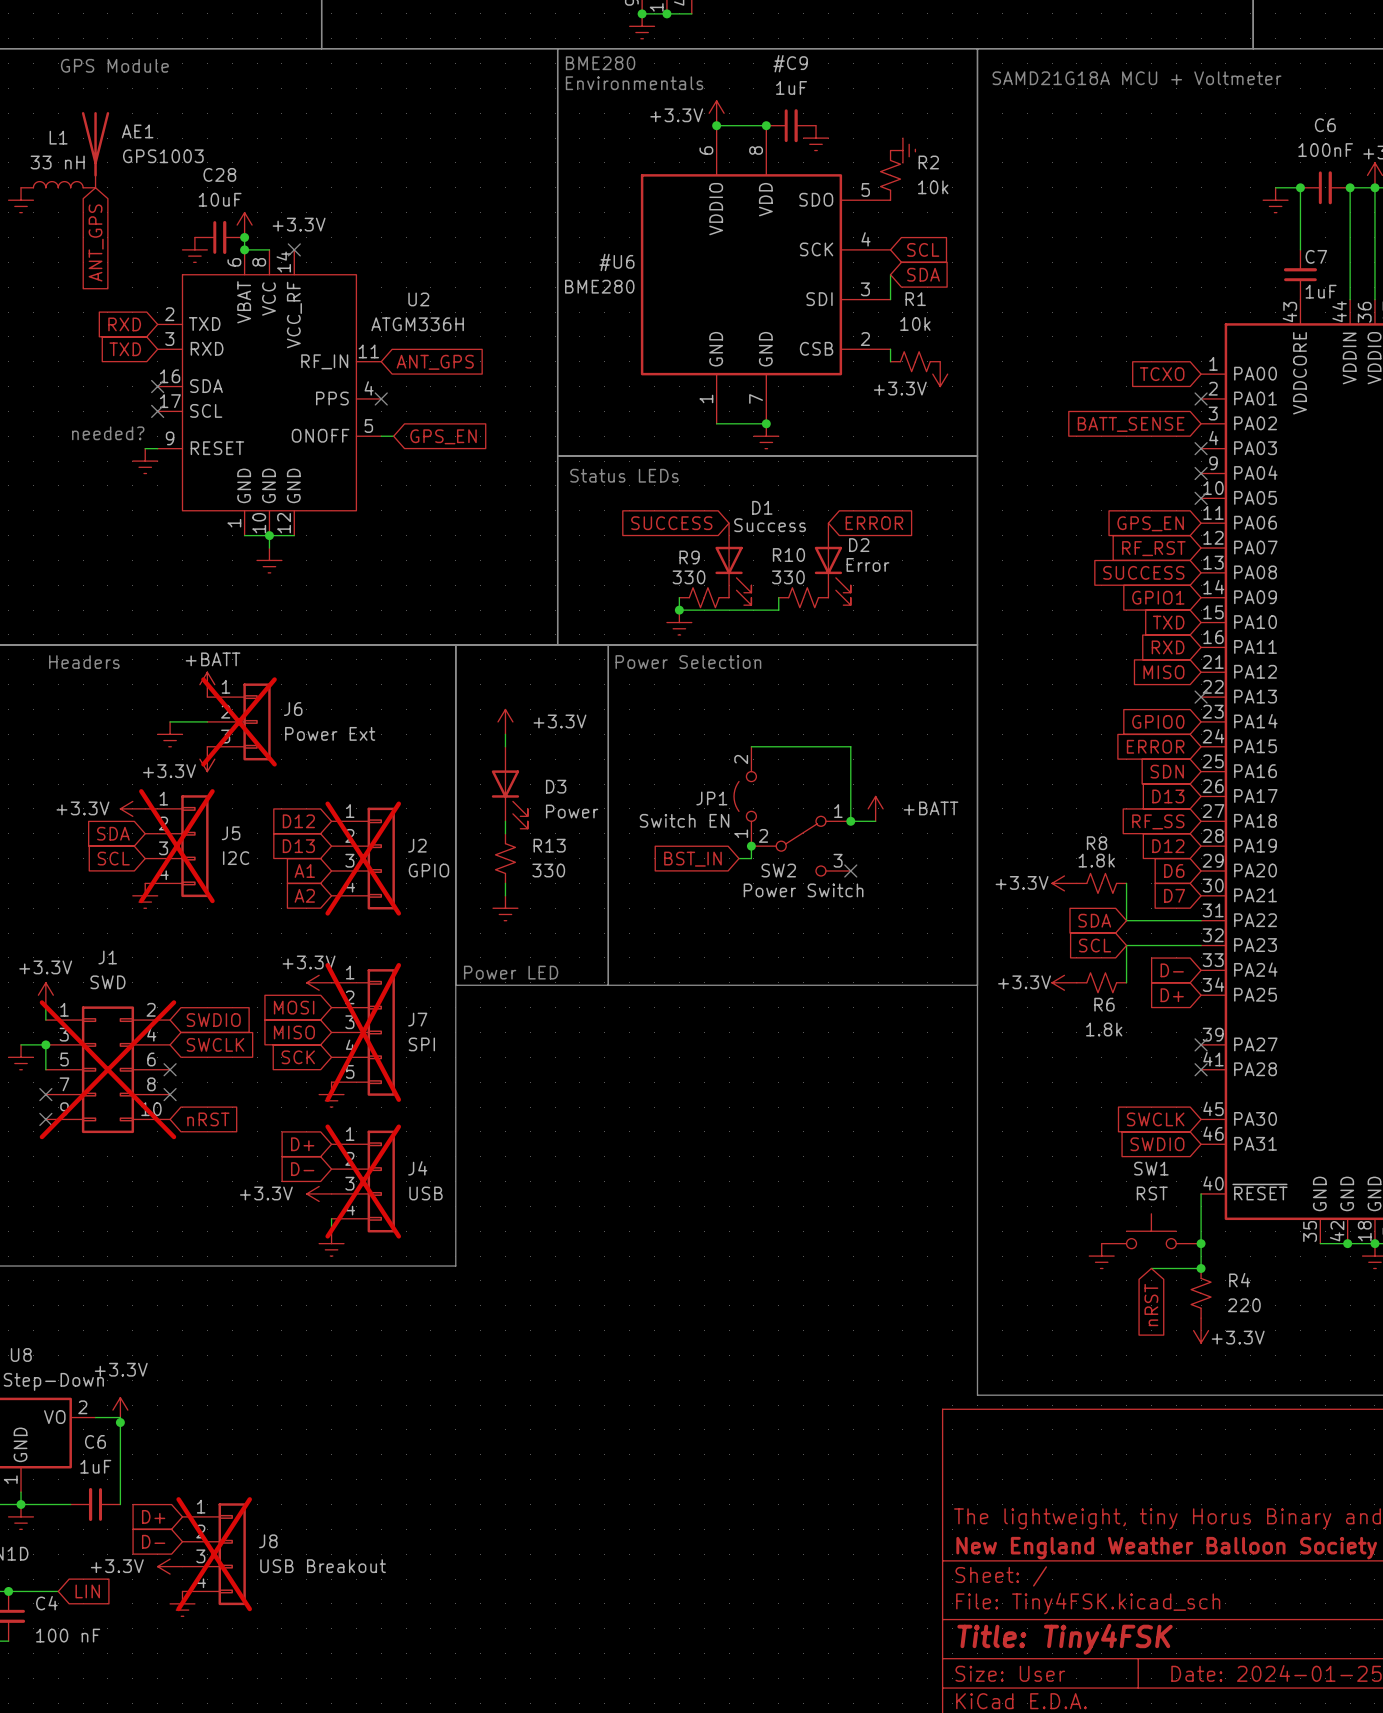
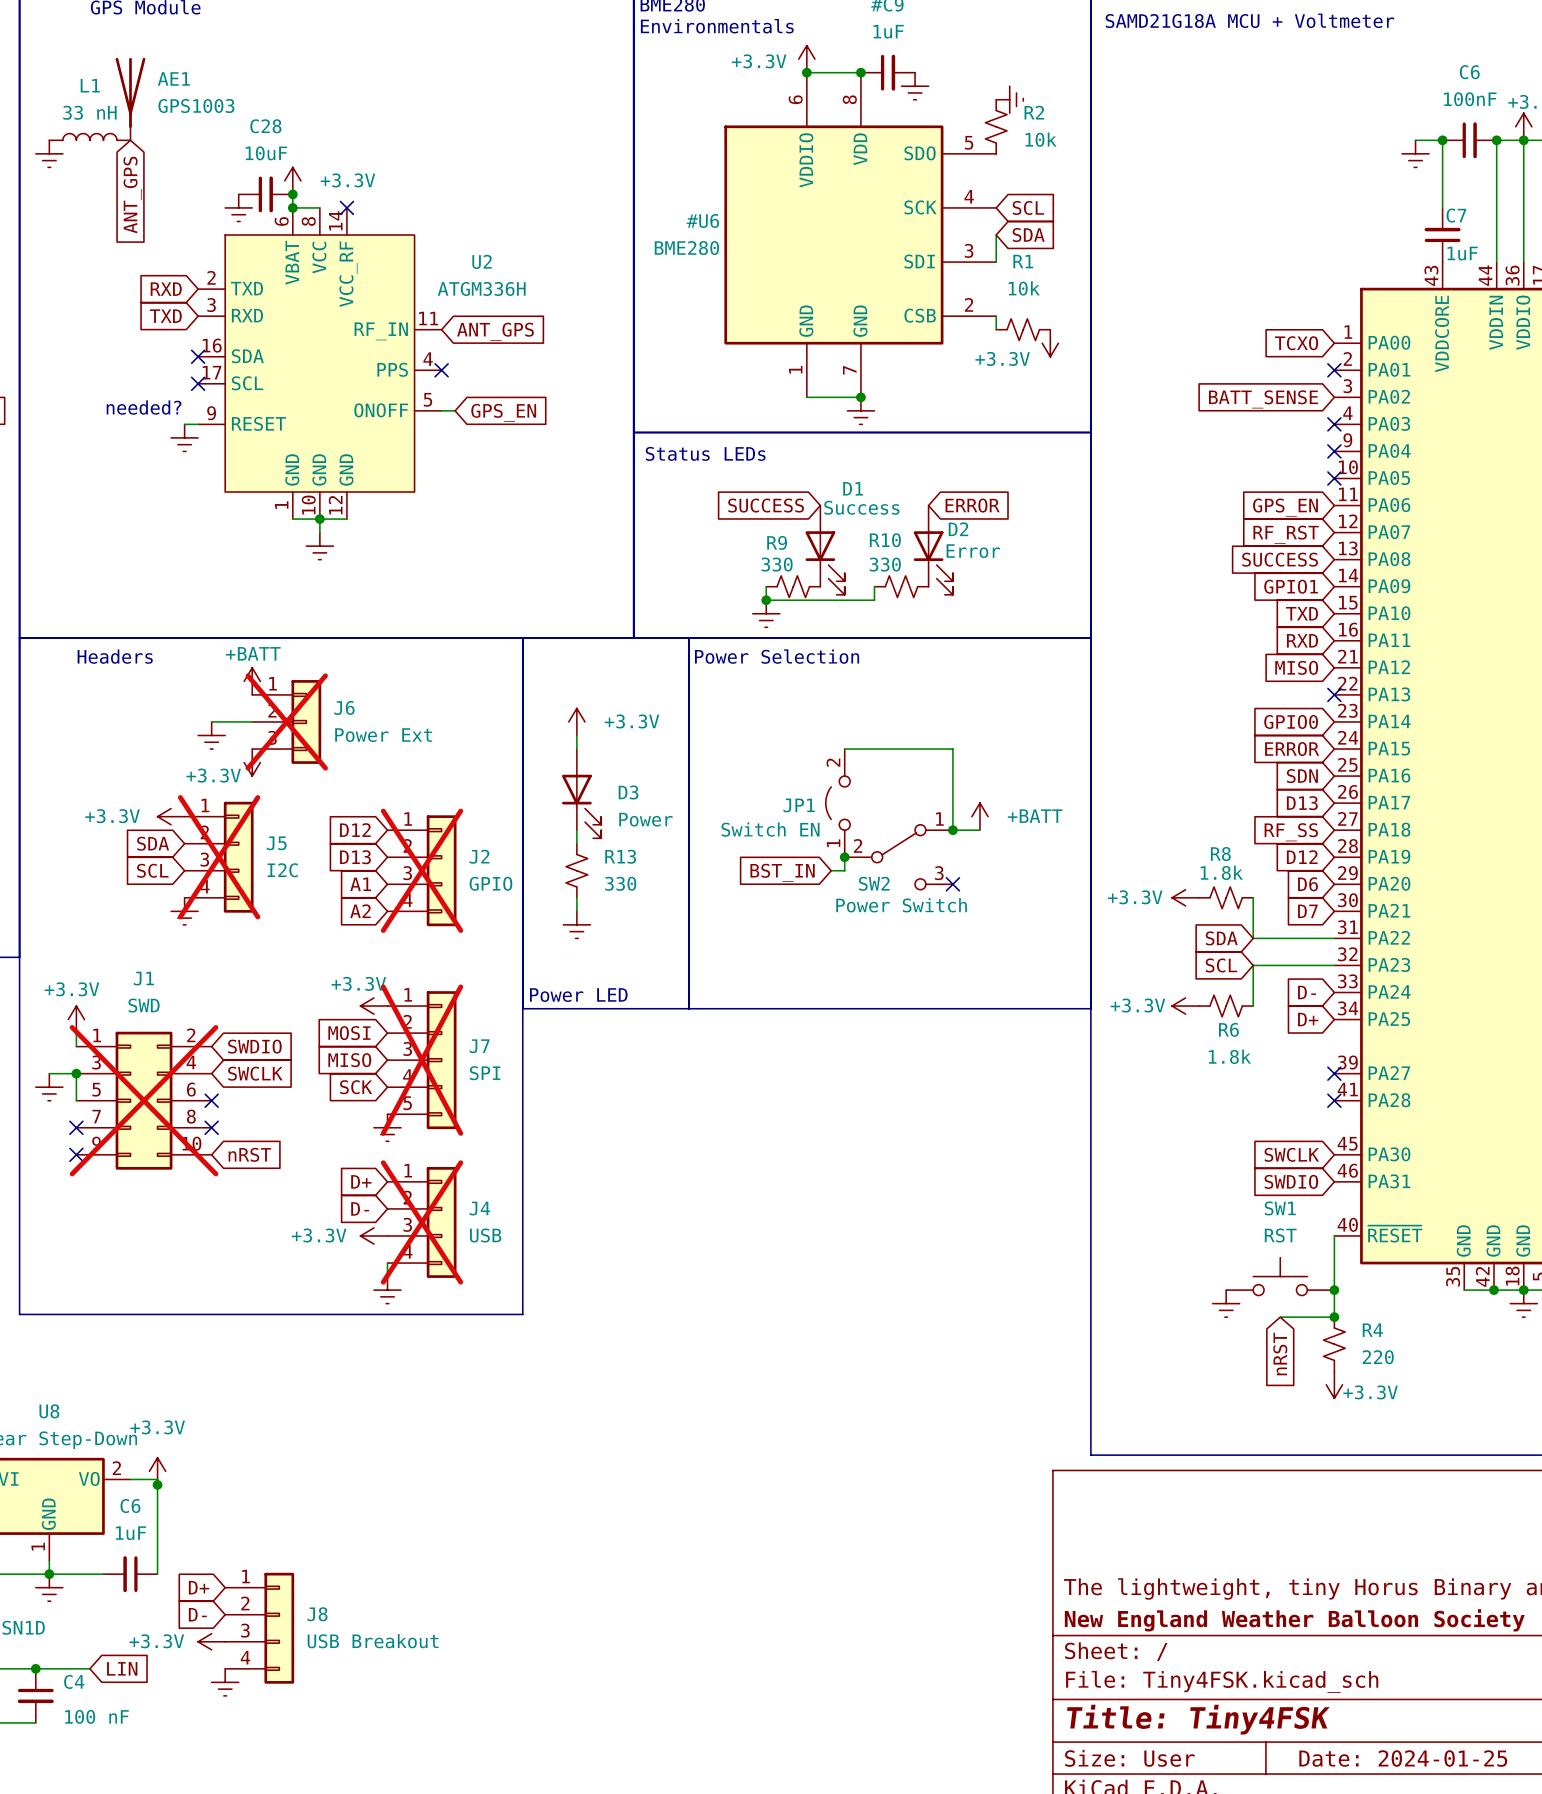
J8 do-not-place cross: (214, 1554) -> none

